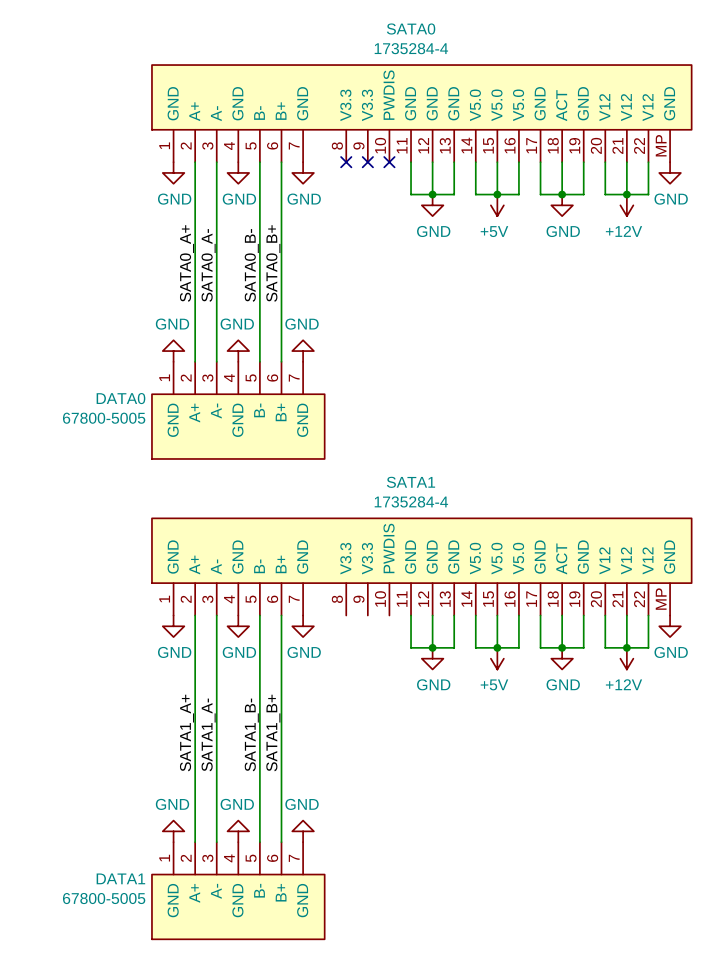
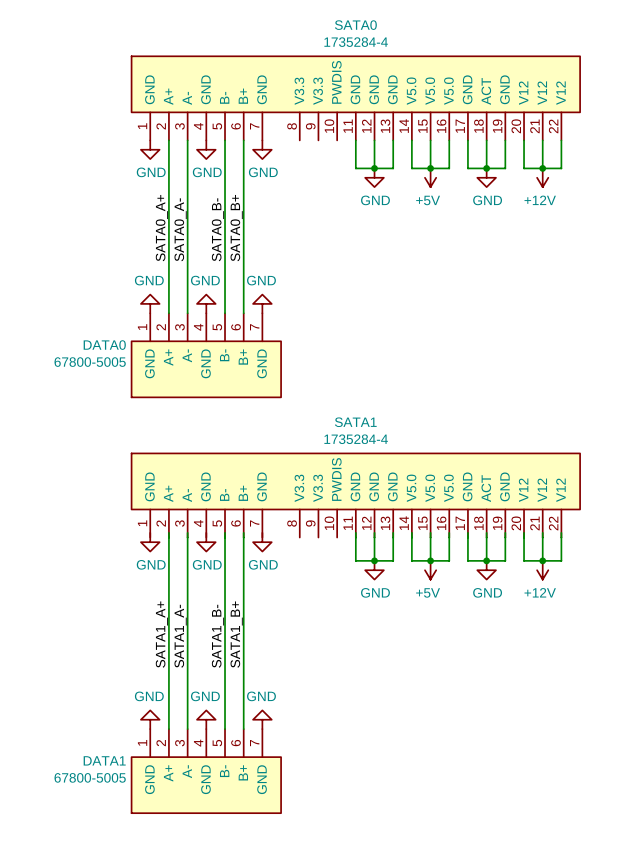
SATA0 symbol: [151, 65, 692, 163] -> [131, 56, 581, 141]
no-connect mark: (346, 162) -> none
no-connect mark: (367, 162) -> none
no-connect mark: (389, 162) -> none
power symbol: GND (670, 172) -> none
SATA1 symbol: [151, 518, 692, 616] -> [131, 453, 581, 538]
power symbol: GND (670, 626) -> none

